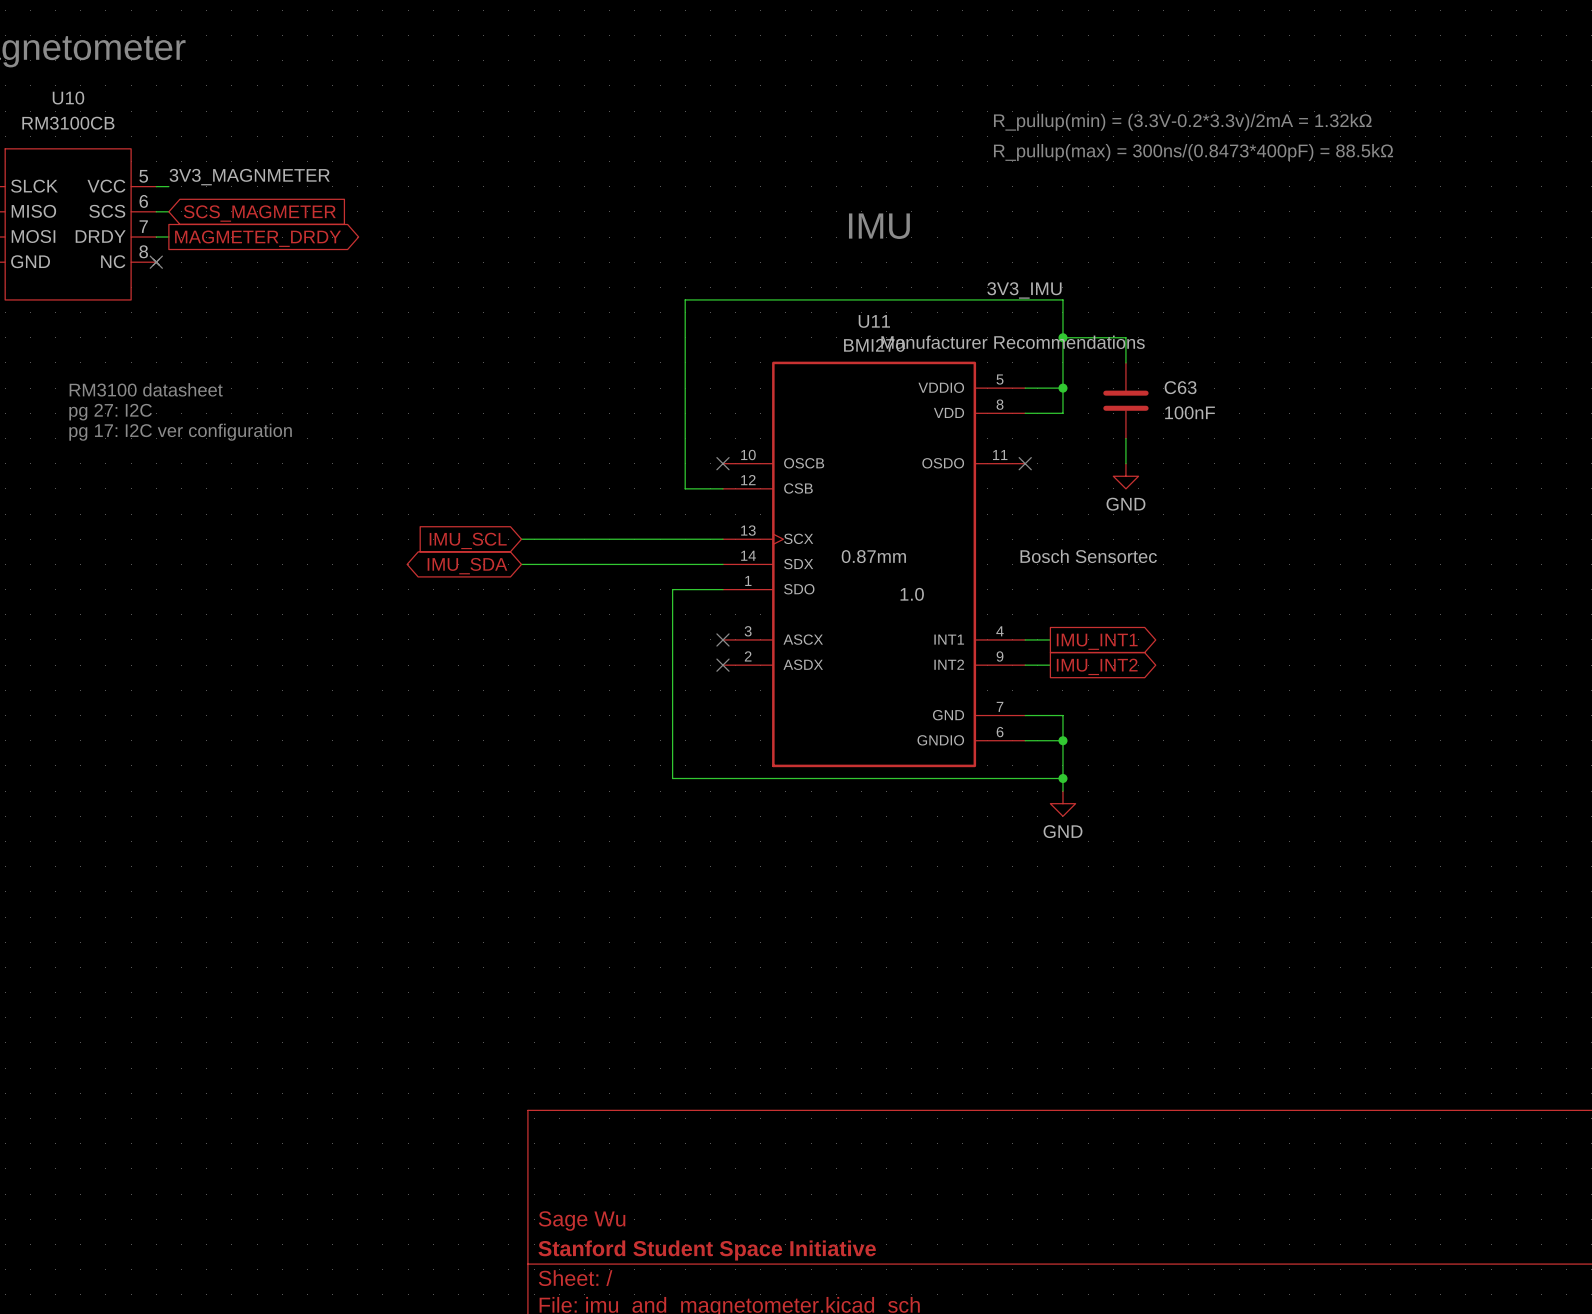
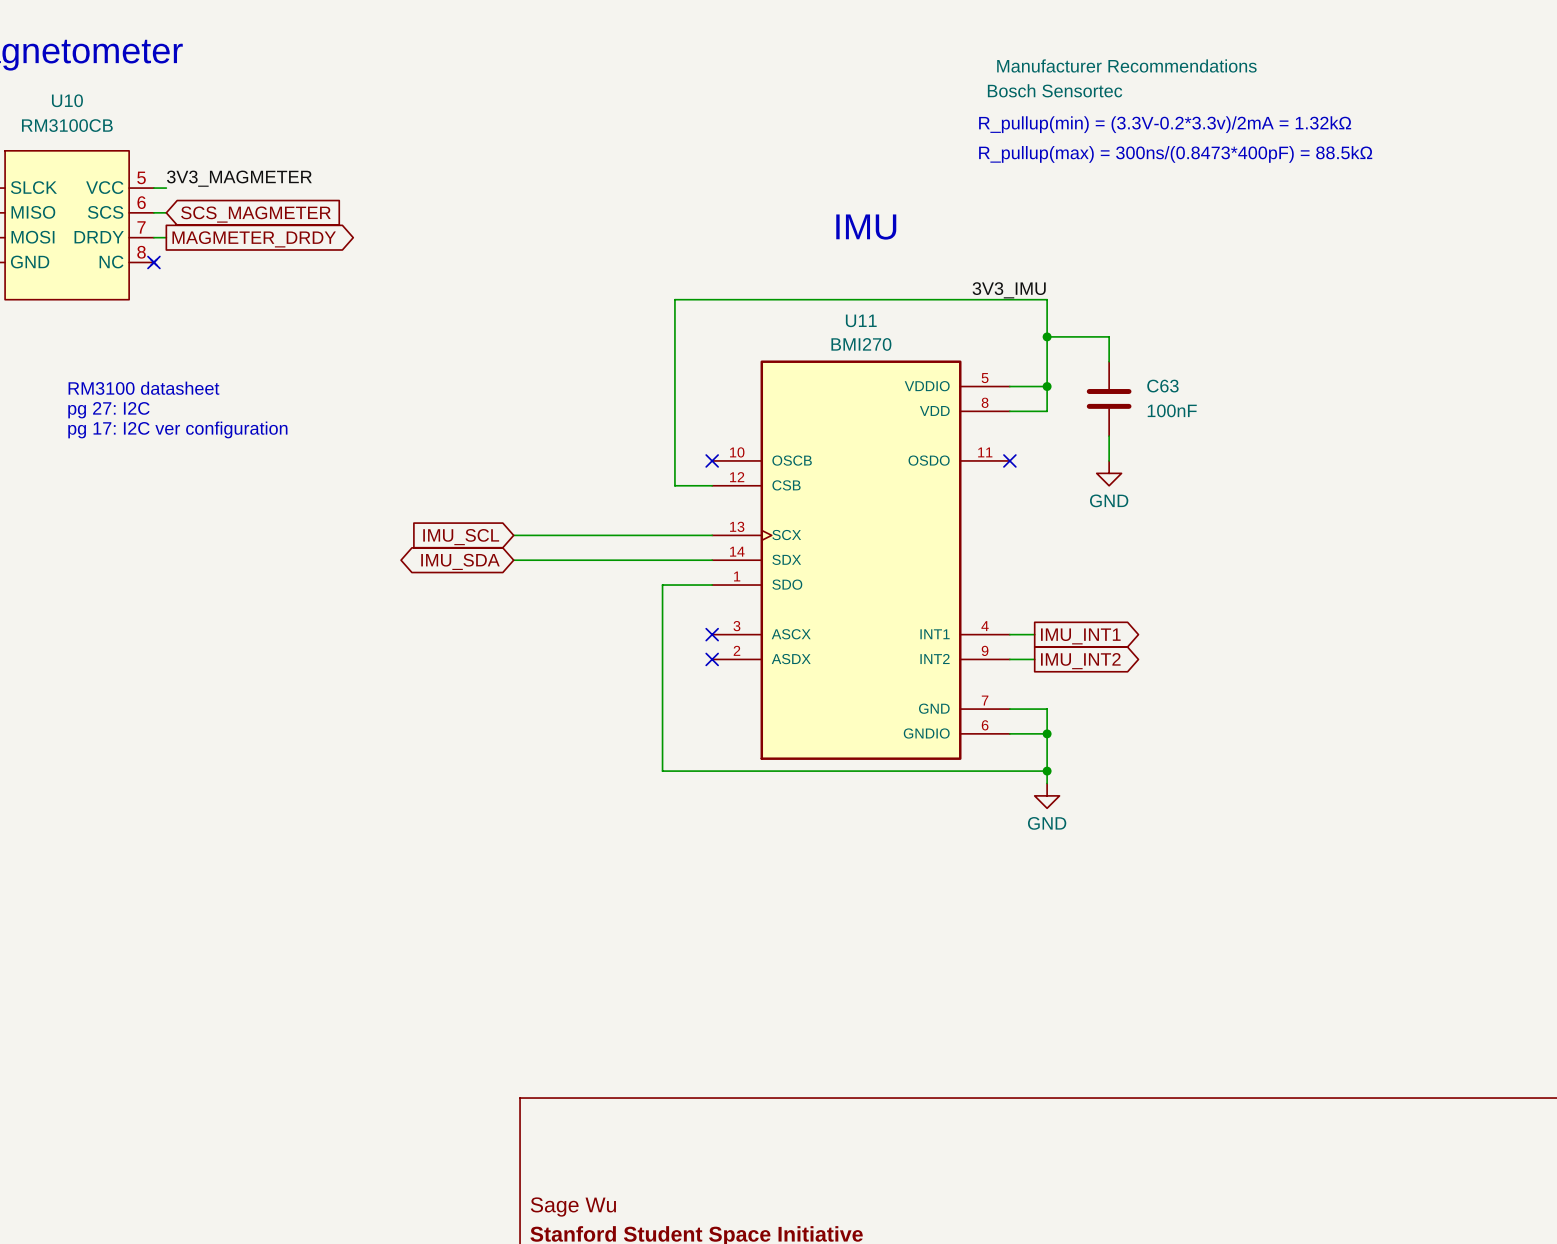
label: 3V3_MAGNMETER (249, 177) -> 3V3_MAGMETER (239, 178)
U11 text position: Manufacturer Recommendations (1013, 342) -> Manufacturer Recommendations (1126, 65)
U11 text: 0.87mm (873, 556) -> none
U11 text position: Bosch Sensortec (1088, 556) -> Bosch Sensortec (1055, 90)
U11 text: 1.0 (912, 594) -> none

